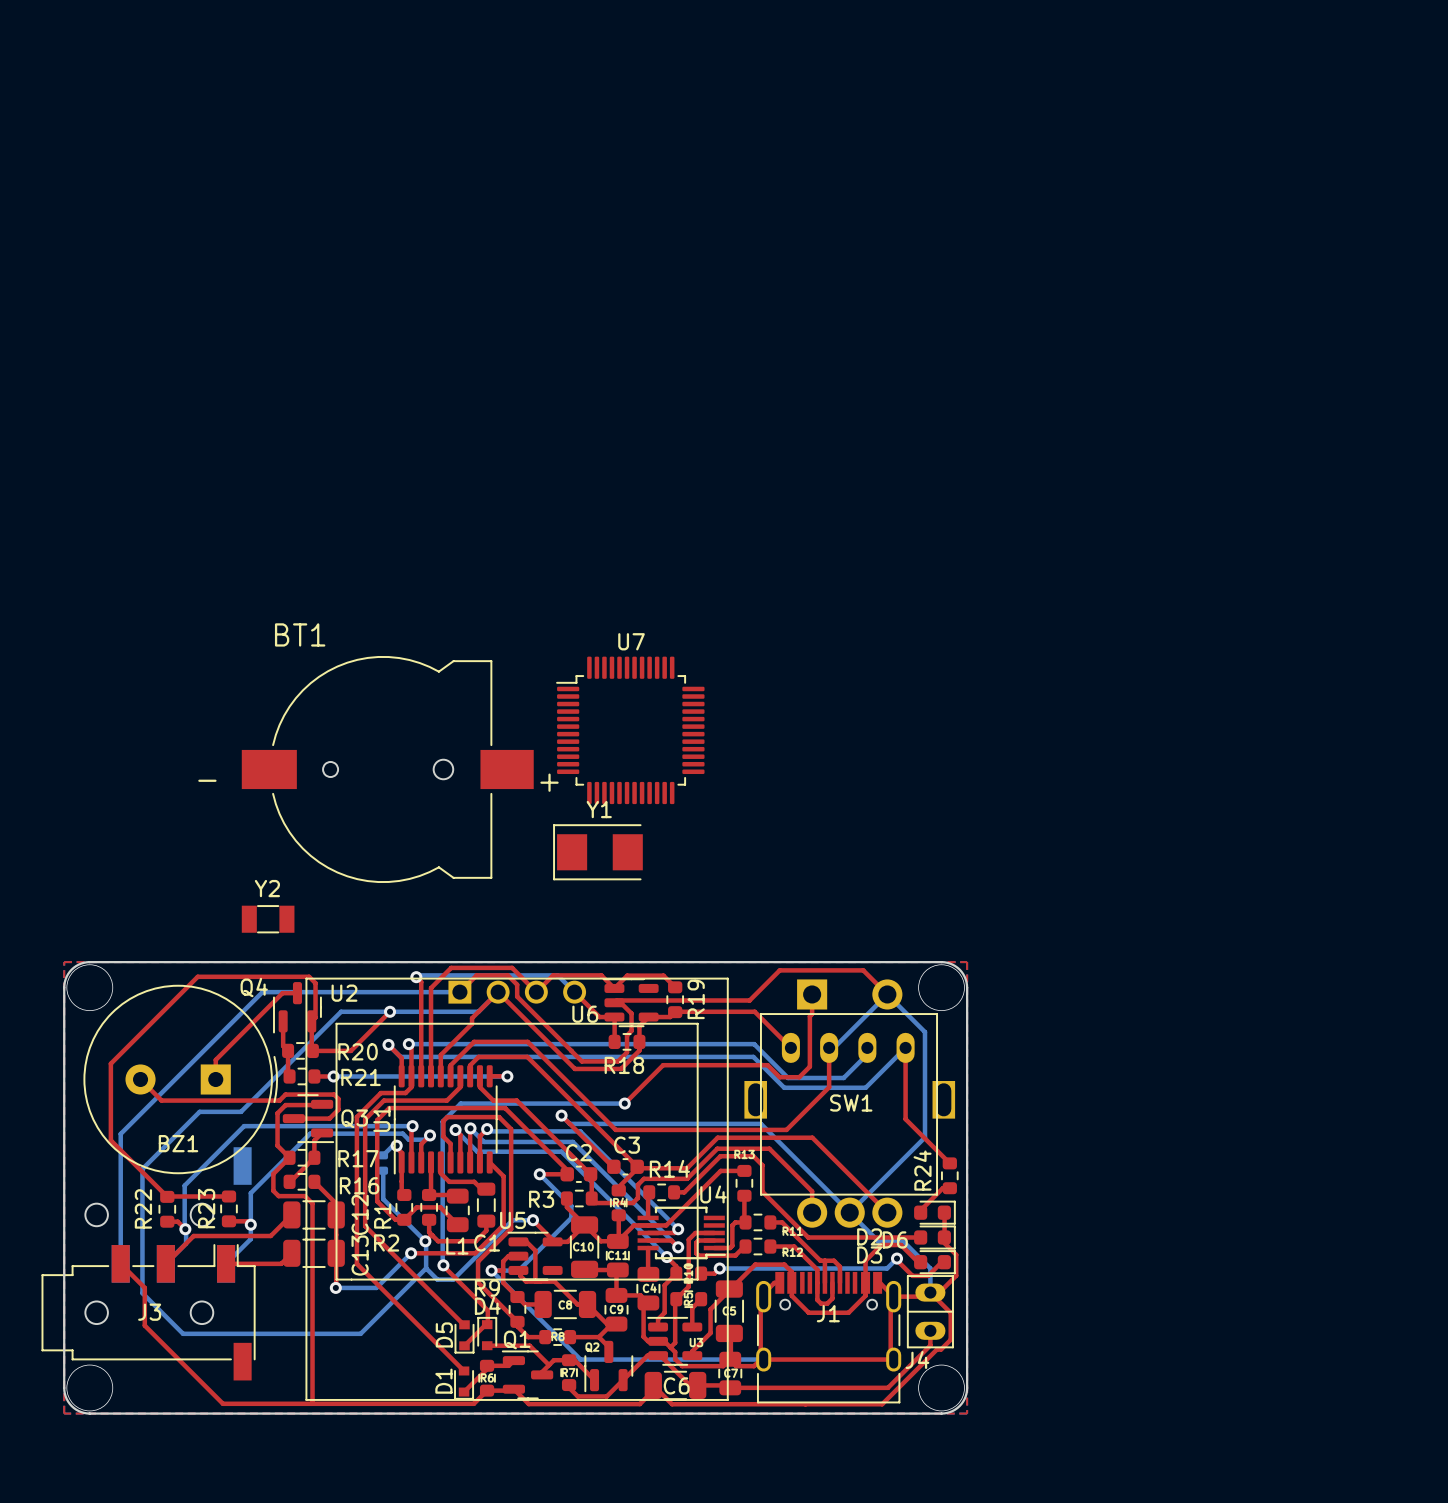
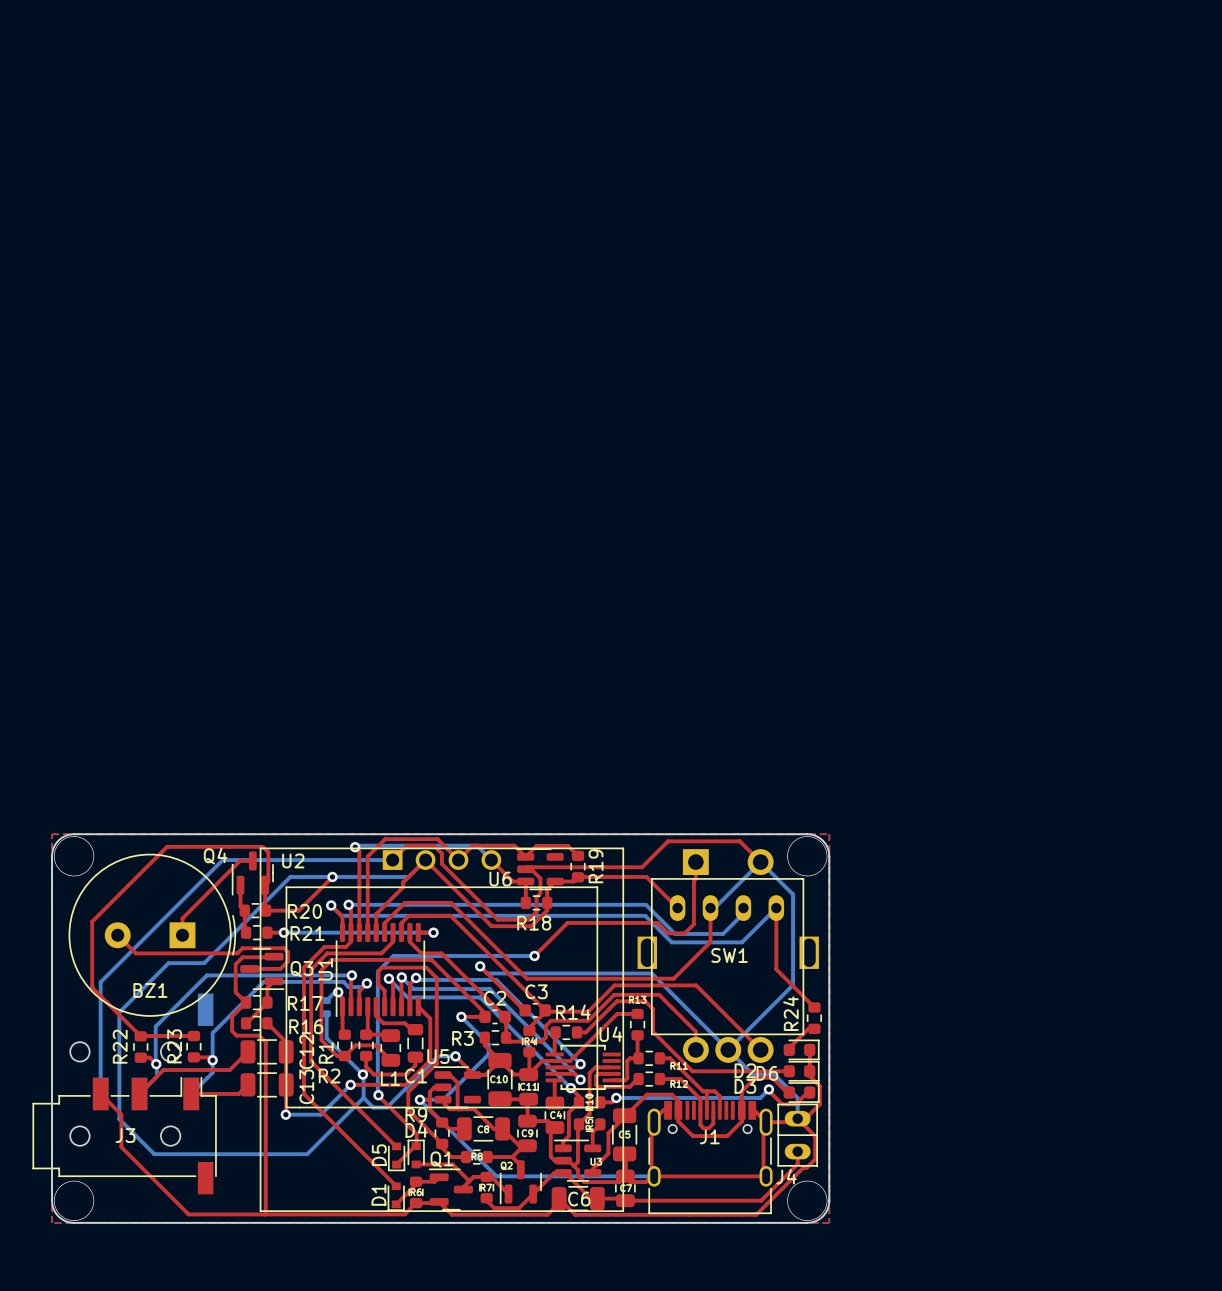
U7: (630, 730) -> none
BT1: (387, 769) -> none
Y1: (597, 852) -> none
Y2: (268, 919) -> none

